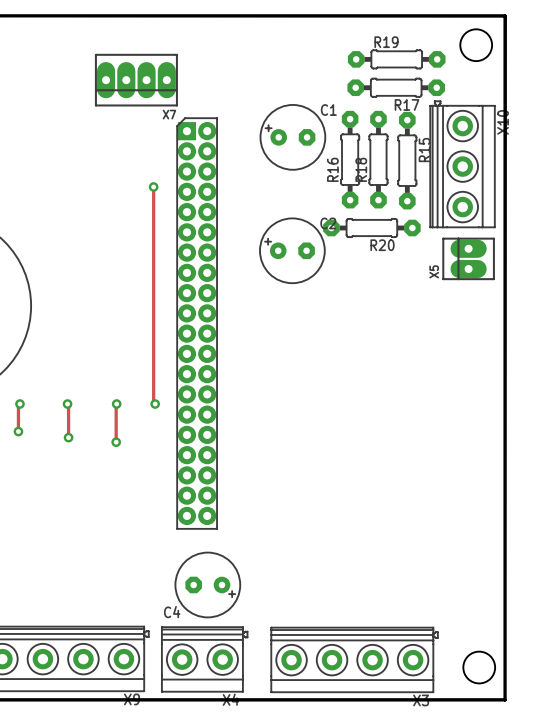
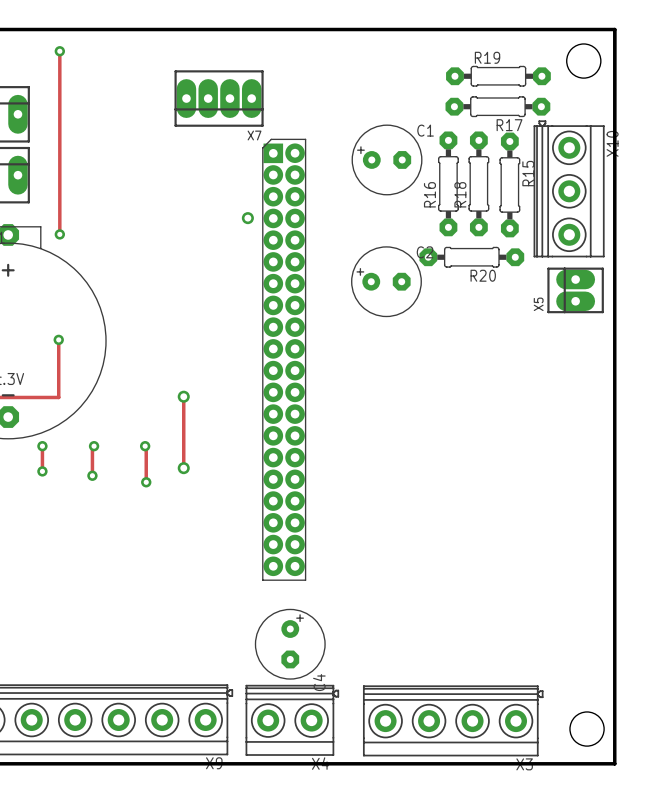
track: (153, 186) (153, 404) (155, 404) -> none
via: (153, 186) -> none
via: none -> (247, 218)
track: none -> (183, 396) (183, 468)
via: none -> (183, 396)
track: (116, 404) (116, 442) -> none
via: (116, 404) -> none
via: (155, 404) -> none
via: none -> (183, 468)
via: (116, 442) -> none
C4 rotation: 0° (207, 584) -> 90° counterclockwise (290, 644)

